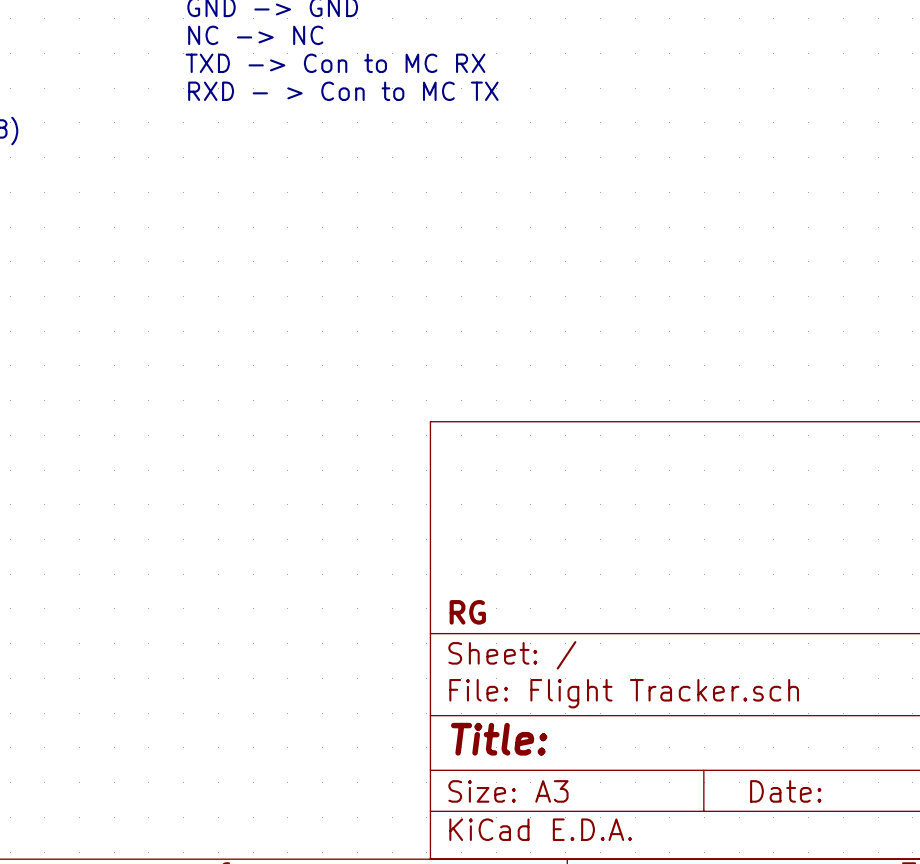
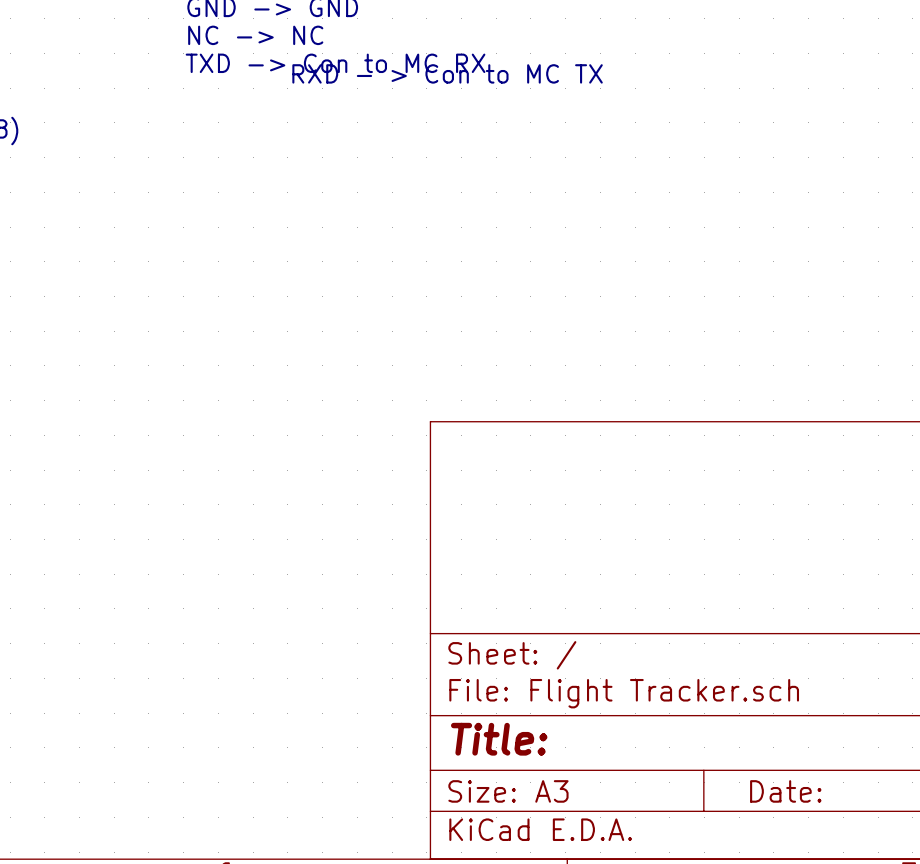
text position: RXD - > Con to MC TX (343, 91) -> RXD - > Con to MC TX (447, 73)
title block: RG (467, 612) -> none

